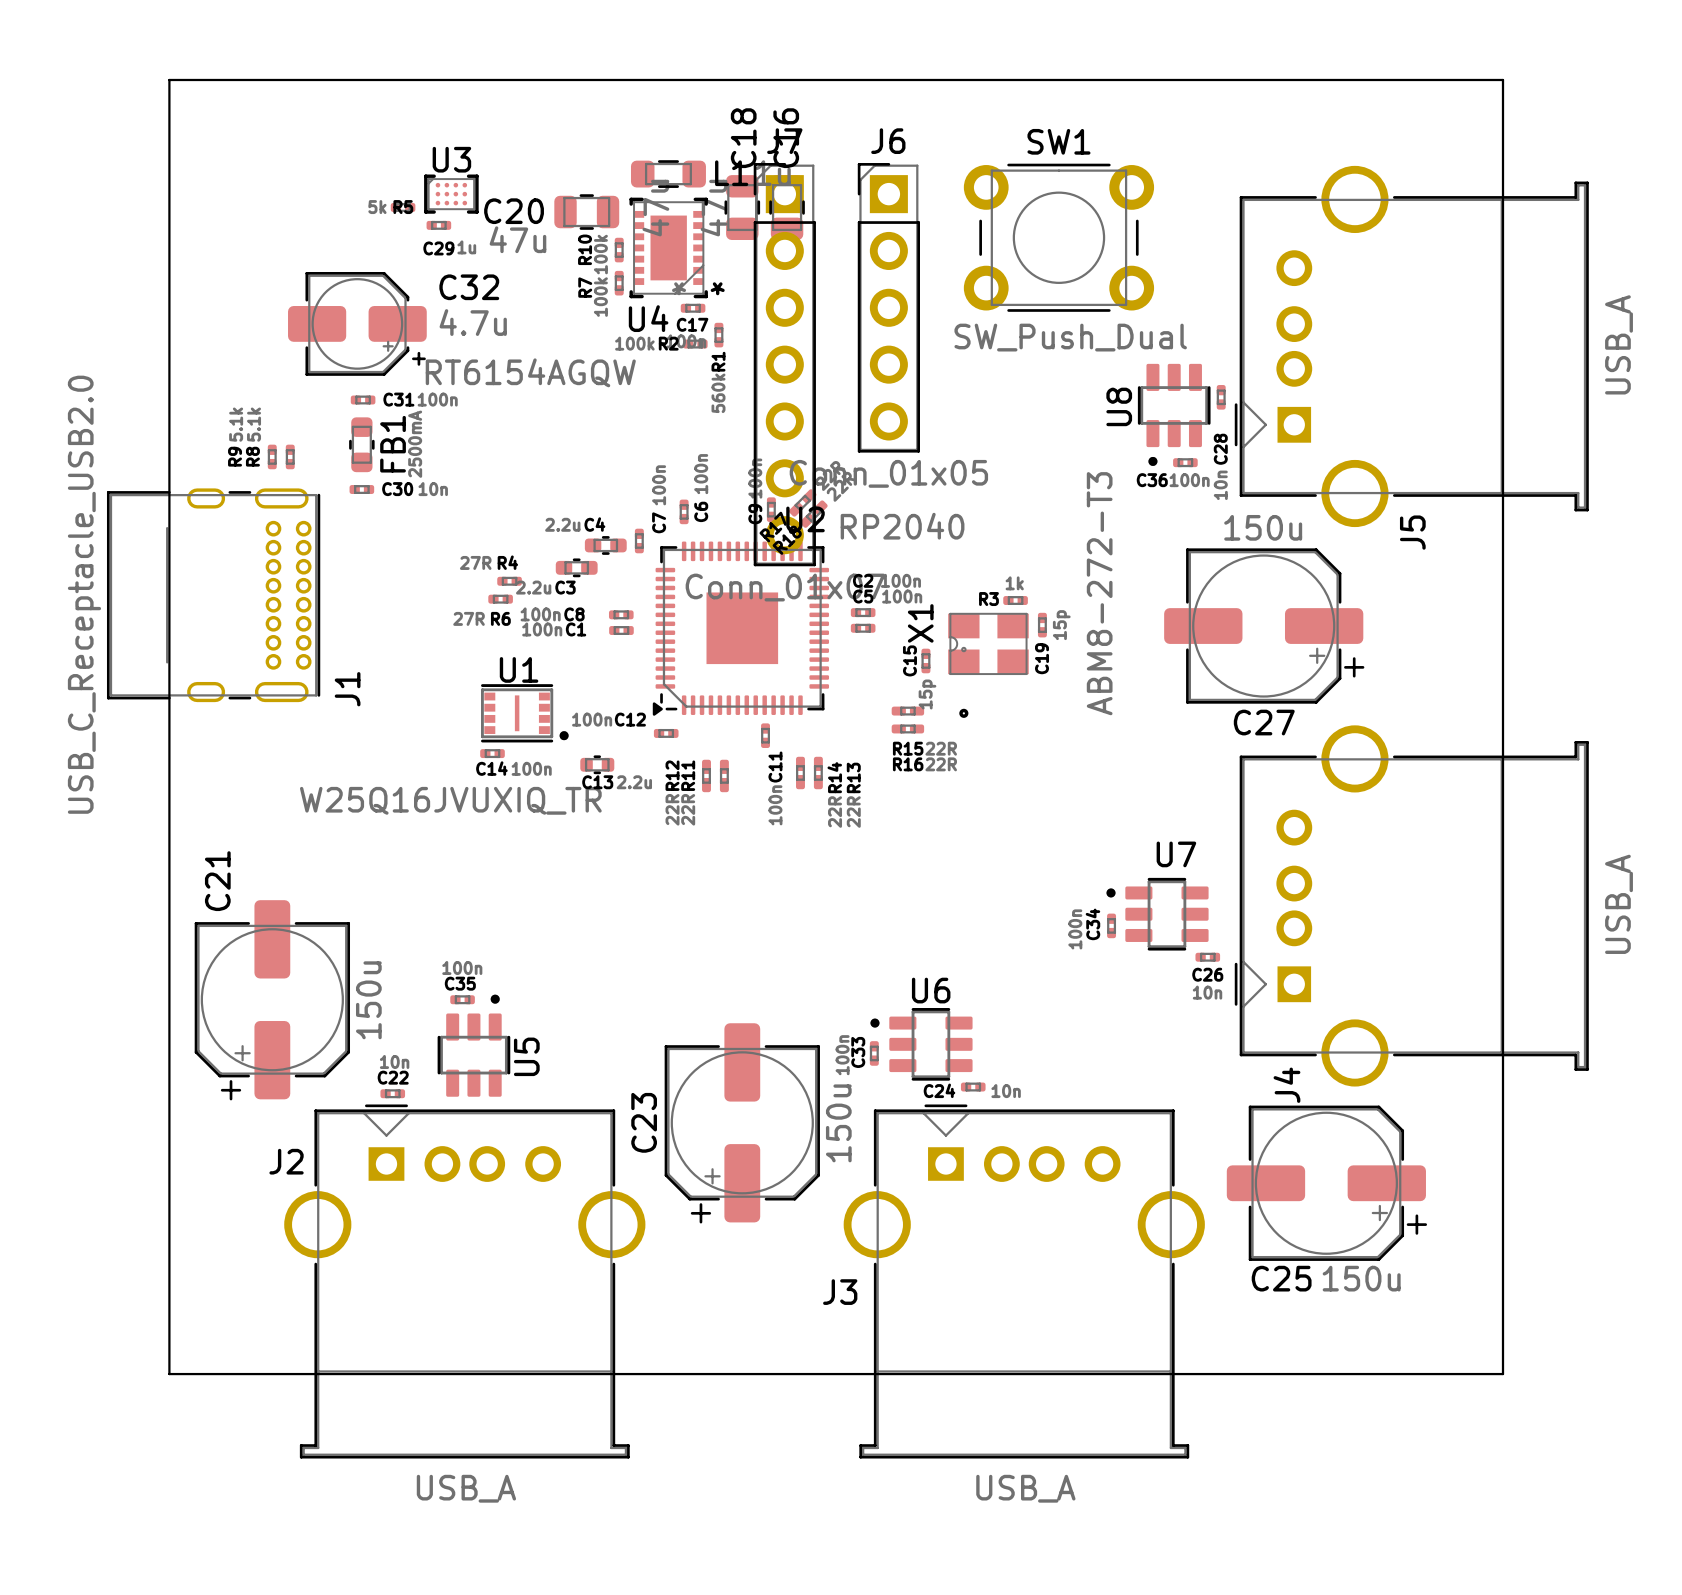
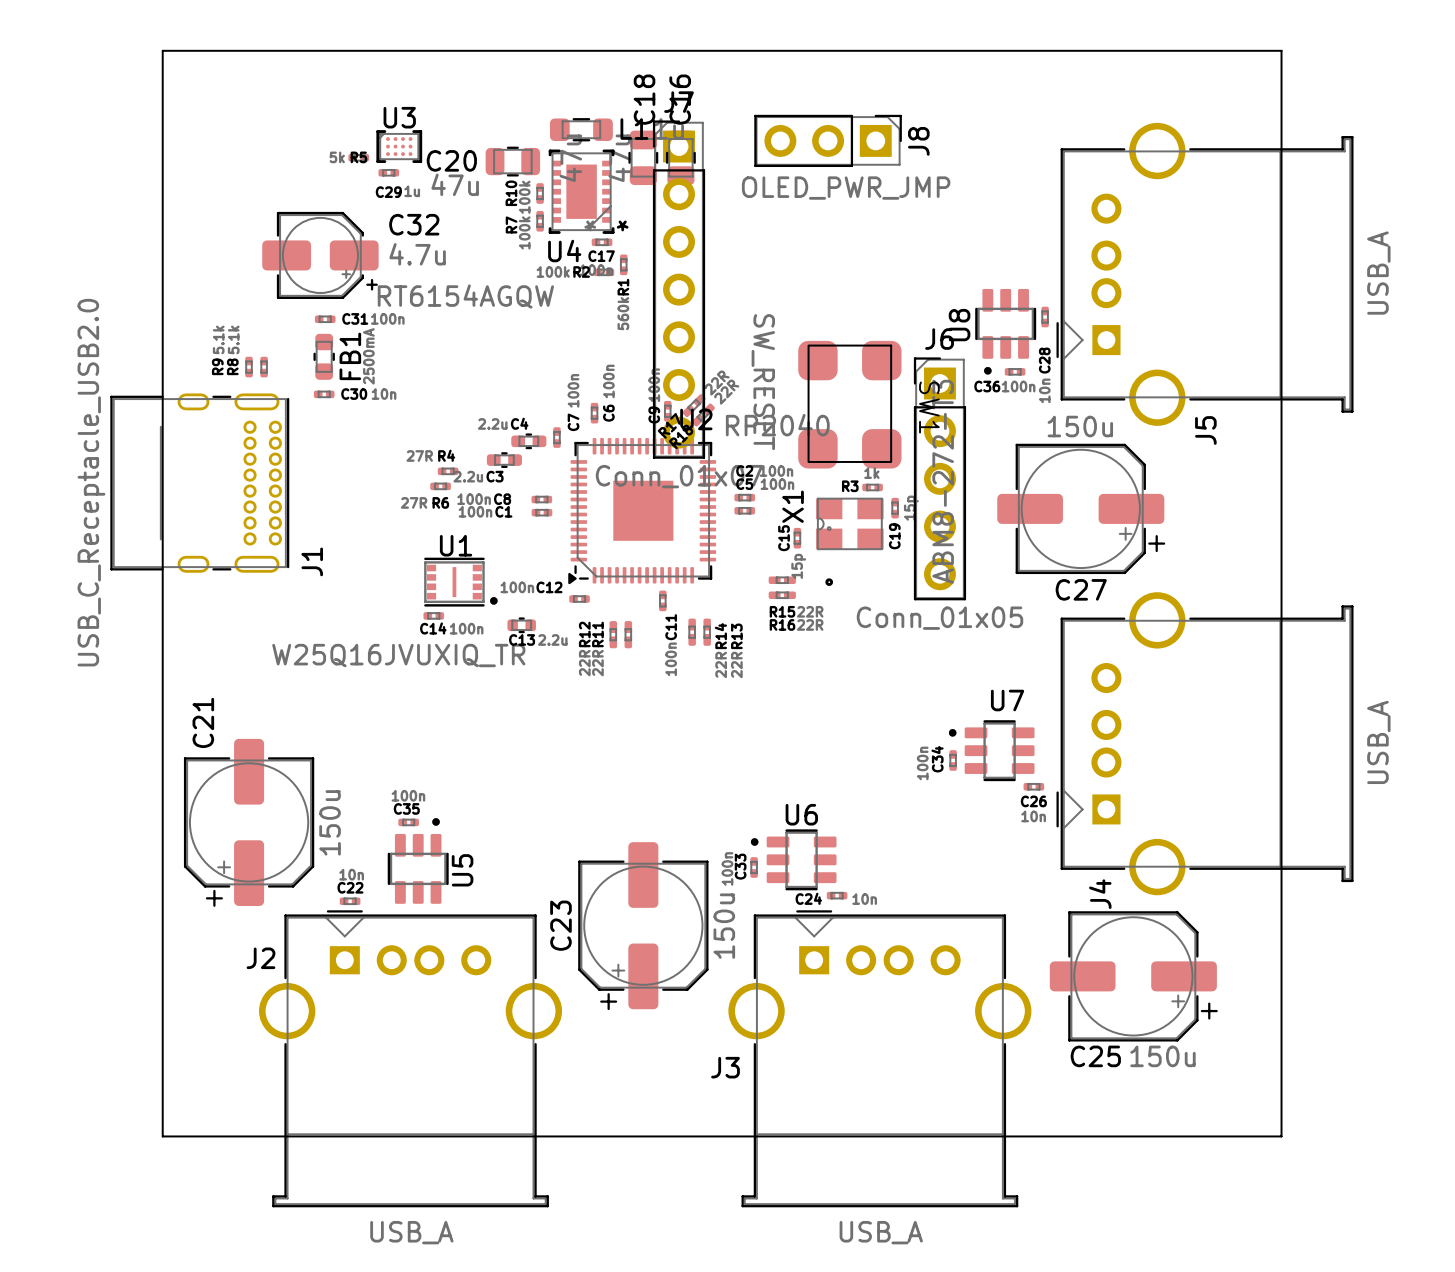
SW1 name position: SW1 (1058, 141) -> SW1 (929, 407)
SW1 footprint: [963, 163, 1155, 312] -> [798, 340, 902, 469]
J8: none -> OLED_PWR_JMP (828, 140)
J6 position: (888, 307) -> (939, 478)
SW1 value: SW_Push_Dual (1070, 337) -> SW_RESET (763, 382)

